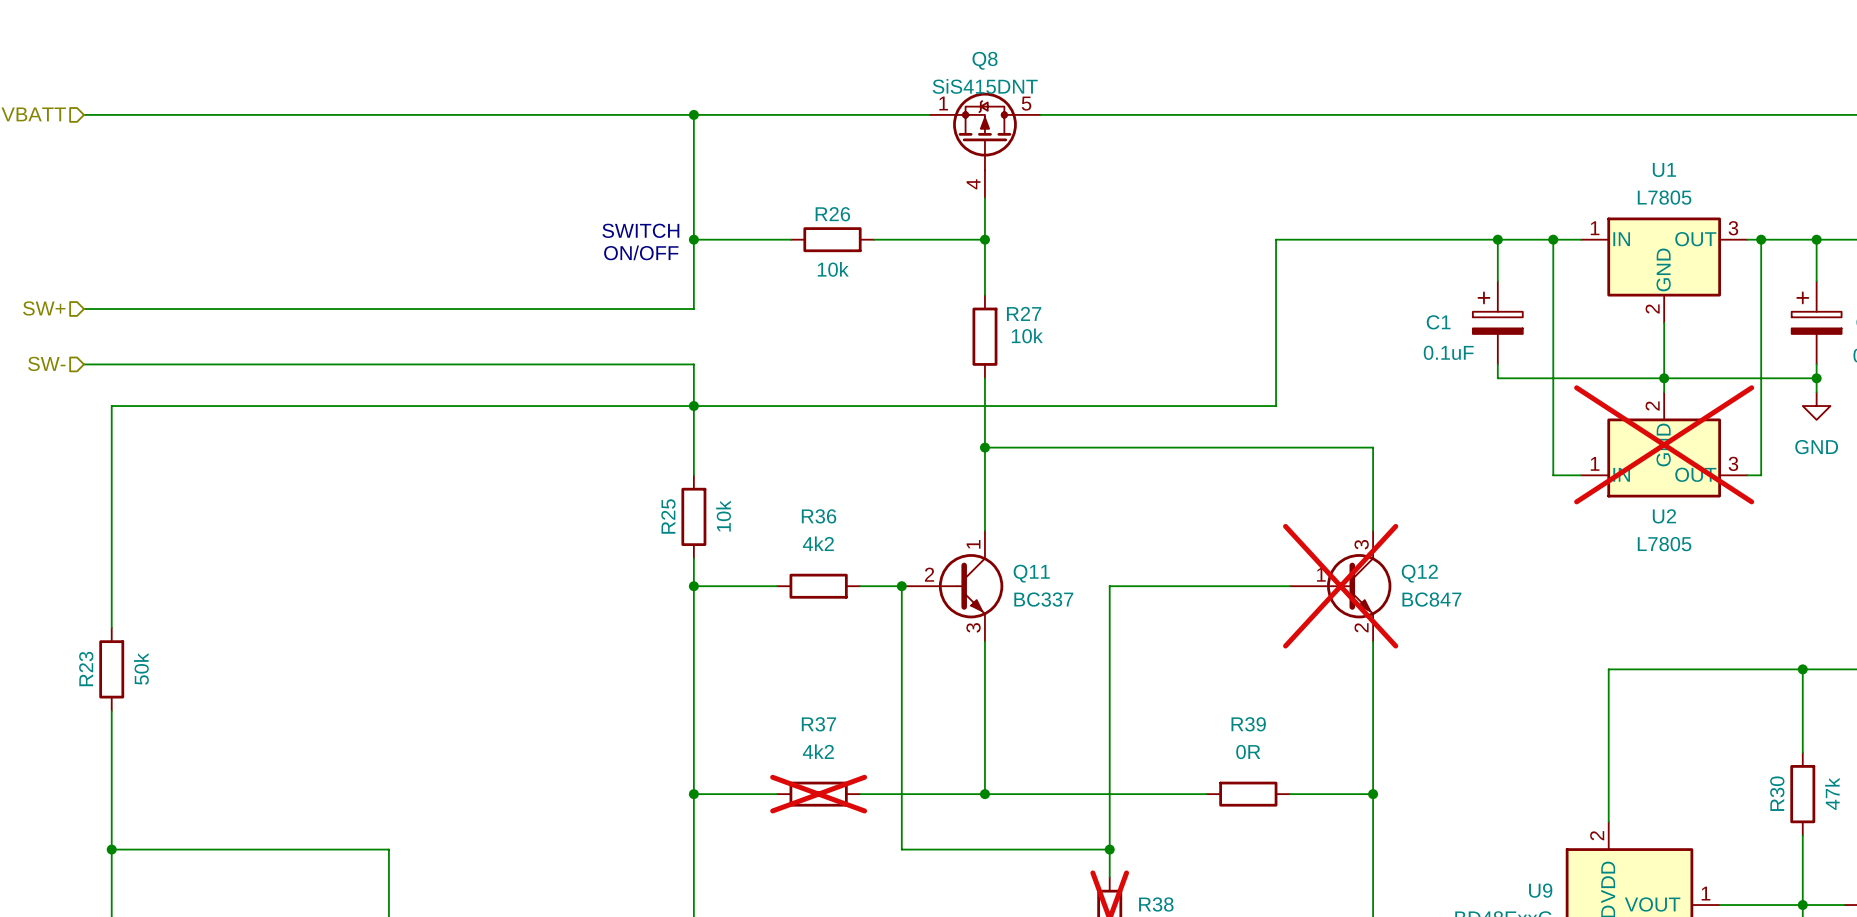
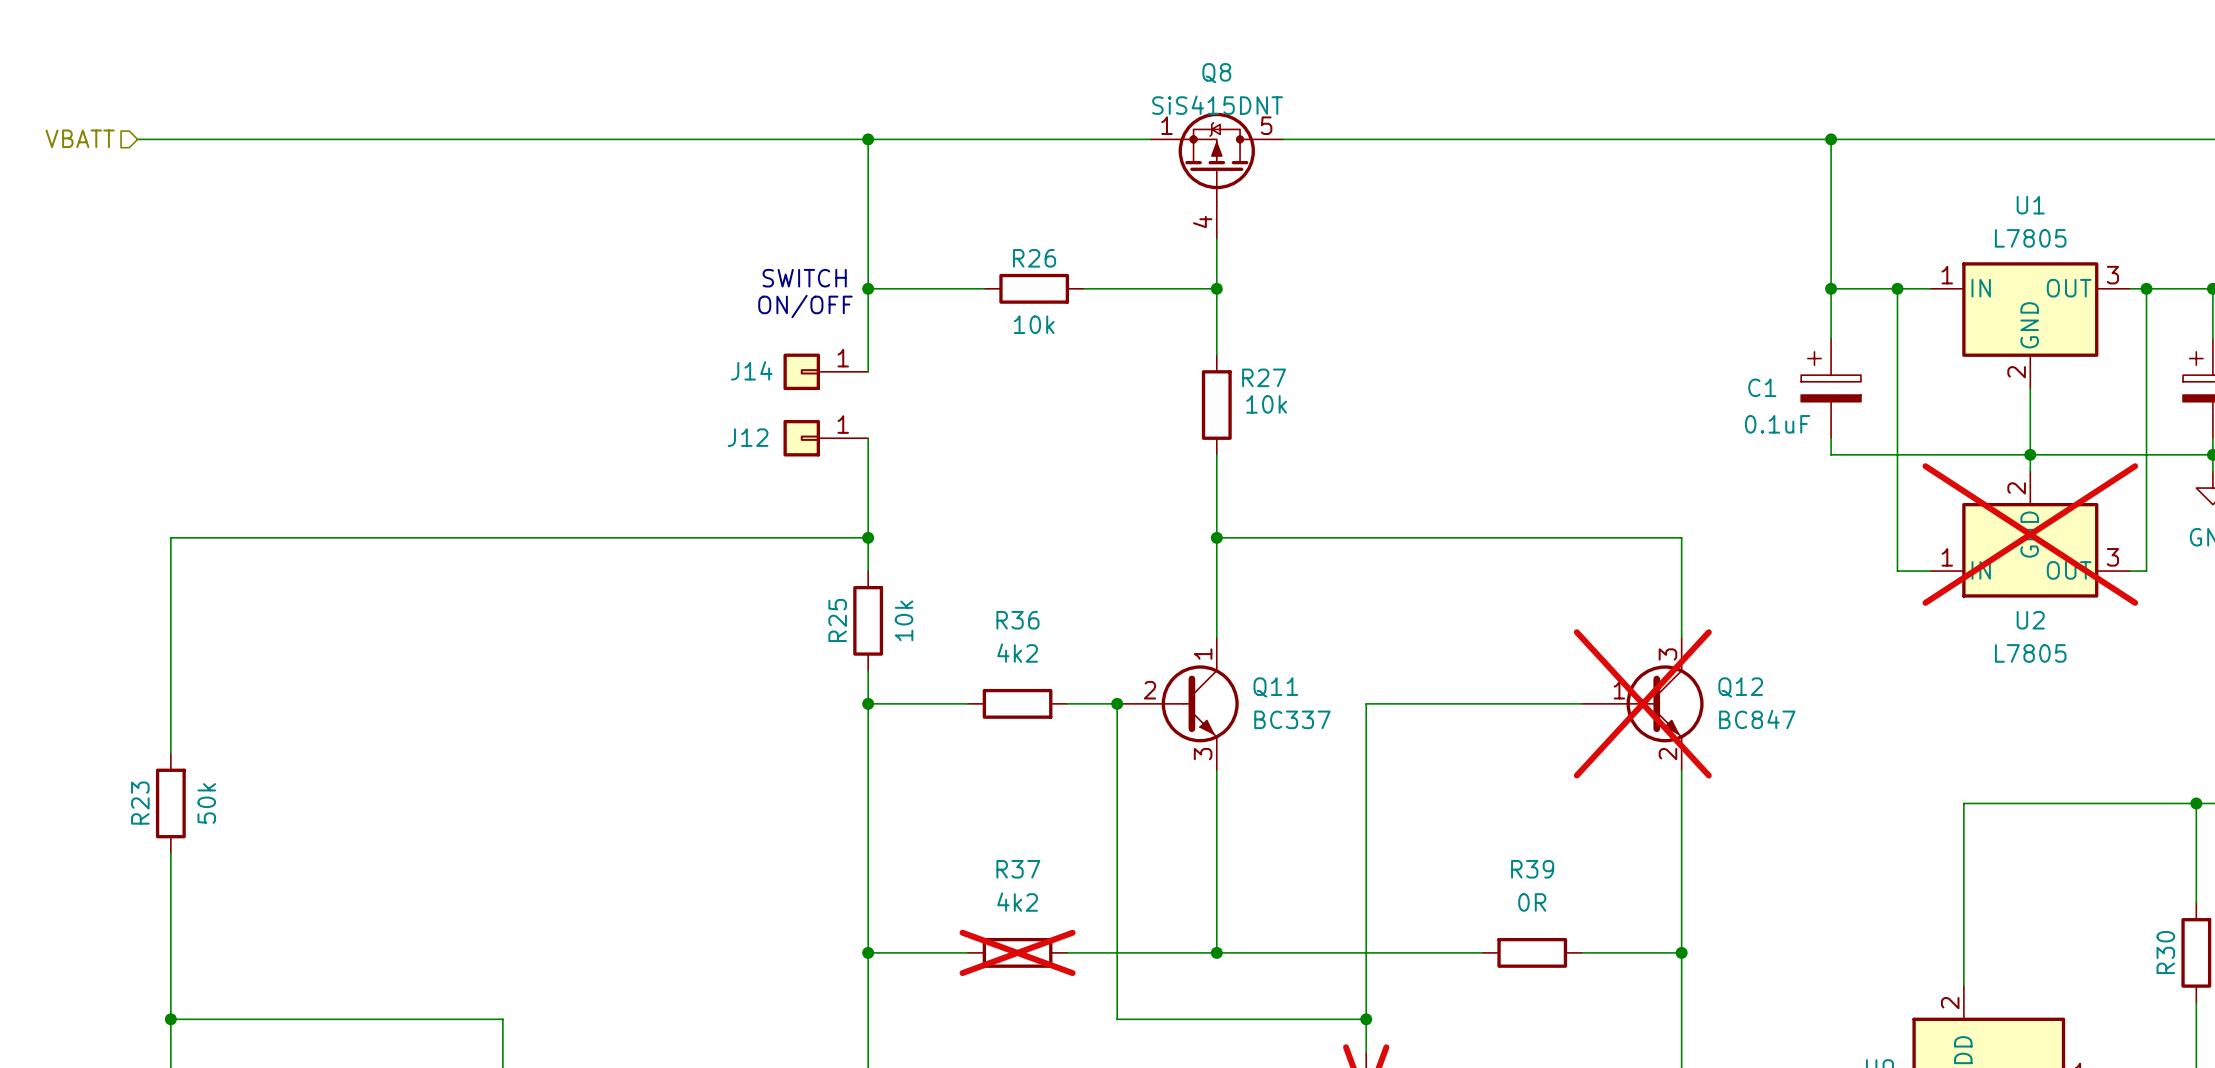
wire: none -> (1831, 139) (1831, 288)
junction: none -> (1831, 139)
wire: (1497, 239) (1276, 239) (1276, 406) (111, 406) (111, 447) -> (868, 537) (170, 537)
hierarchical label: SW+ (44, 308) -> none
wire: (84, 308) (693, 308) -> none
J14: none -> (825, 371)
hierarchical label: SW- (46, 363) -> none
wire: (84, 364) (693, 364) -> none
J12: none -> (825, 438)
junction position: (693, 406) -> (868, 537)

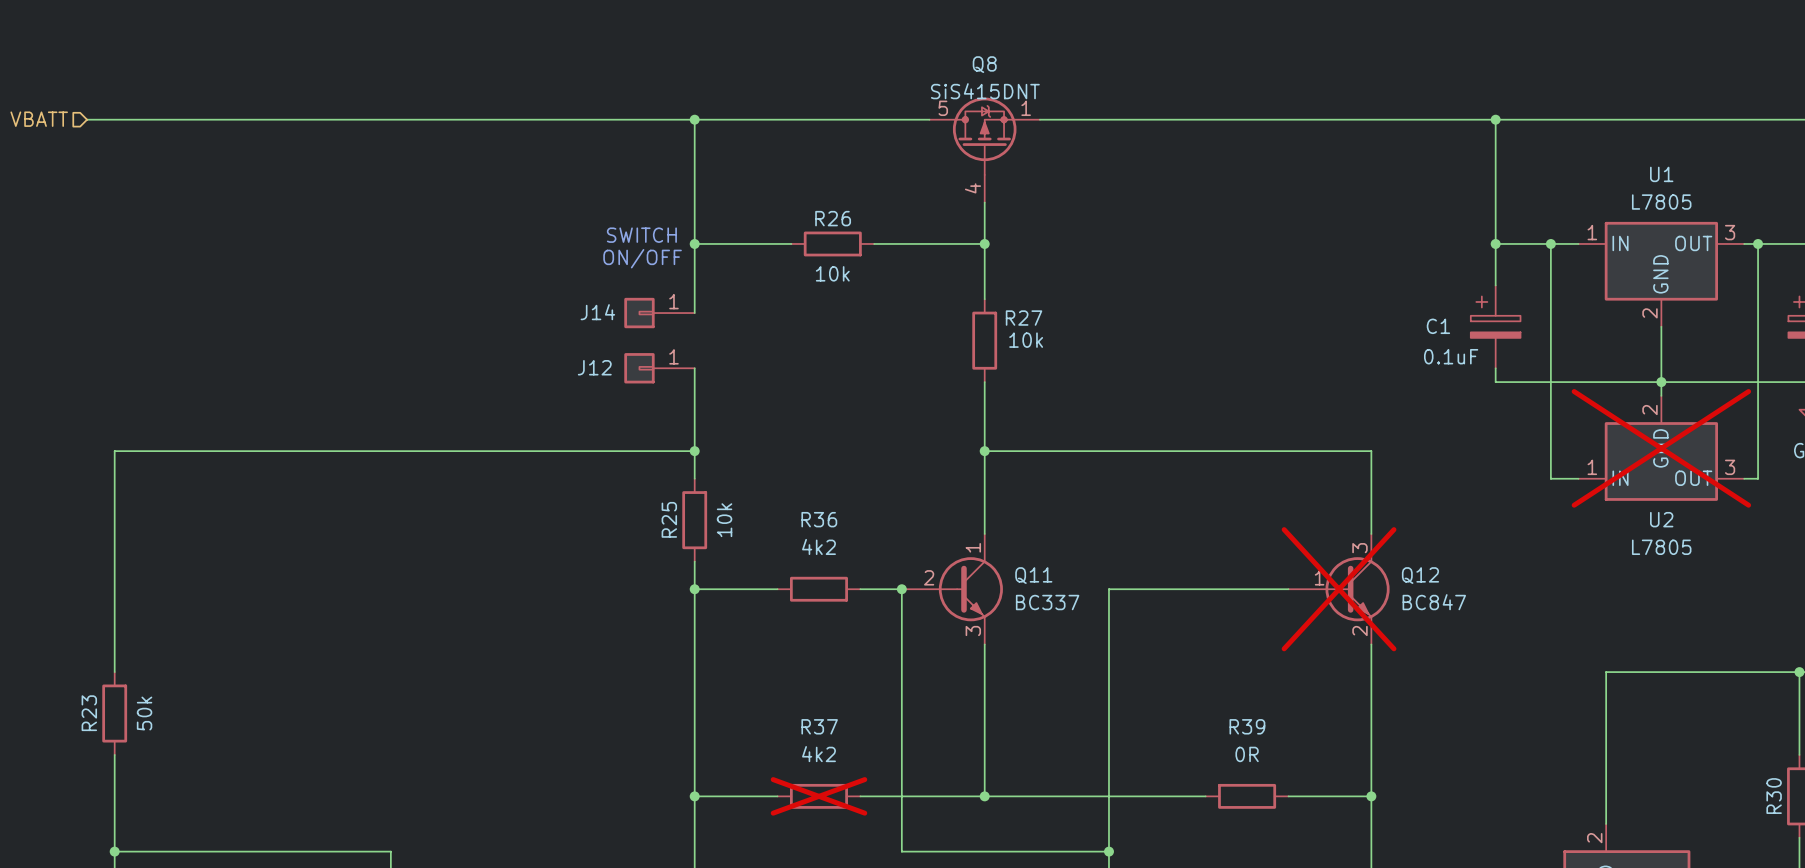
Q8 flip: as is (1216, 159) -> left-right (984, 136)
R23 position: (170, 803) -> (114, 713)
wire: (170, 853) (170, 903) -> (114, 630) (114, 672)

